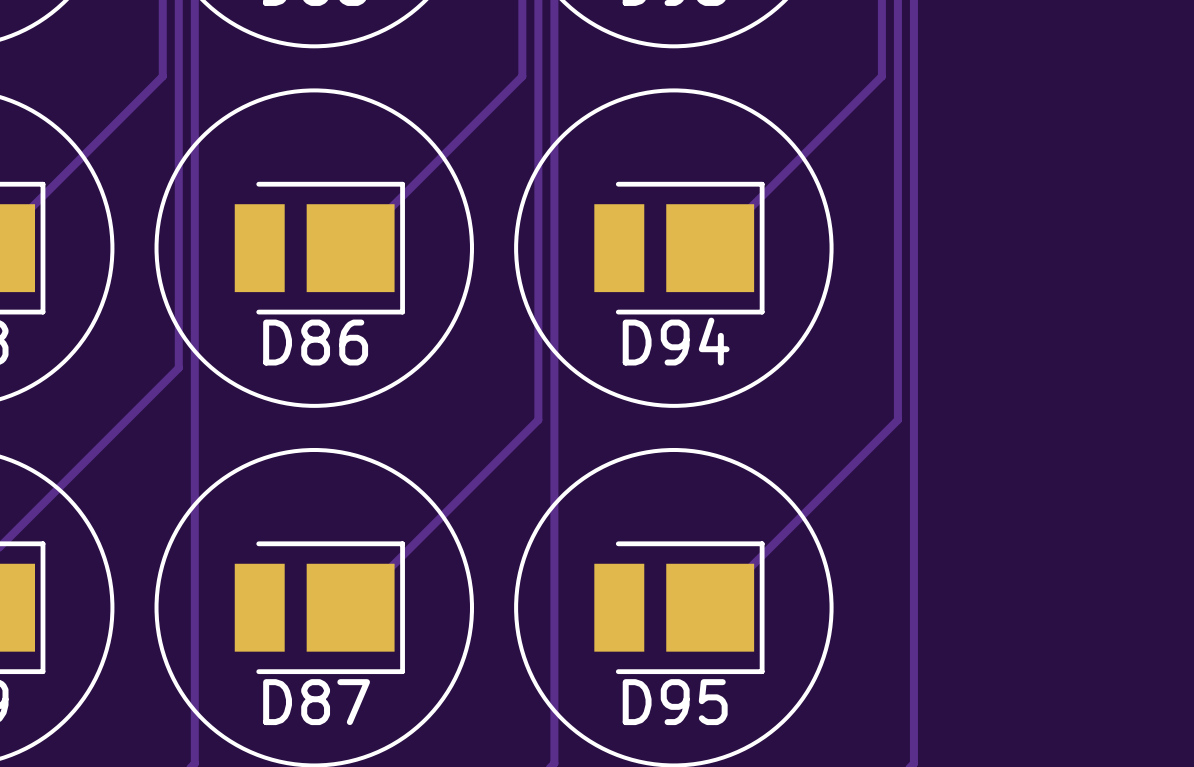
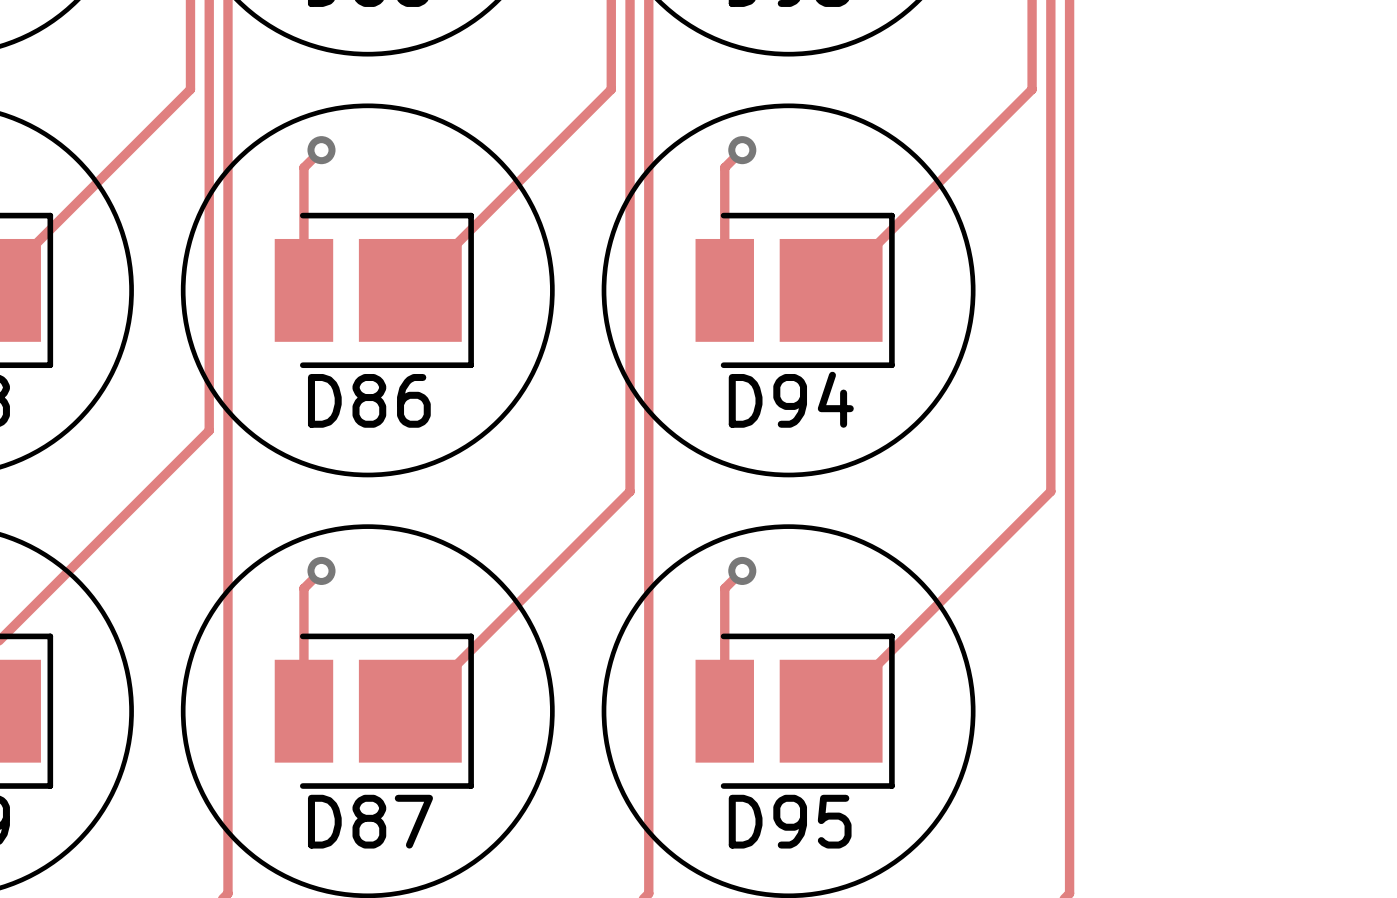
track: none -> (321, 150) (303, 167) (303, 290)
via: none -> (321, 150)
track: none -> (742, 150) (724, 167) (724, 290)
via: none -> (742, 150)
track: none -> (321, 570) (303, 588) (303, 711)
via: none -> (321, 570)
track: none -> (742, 570) (724, 588) (724, 711)
via: none -> (742, 570)

